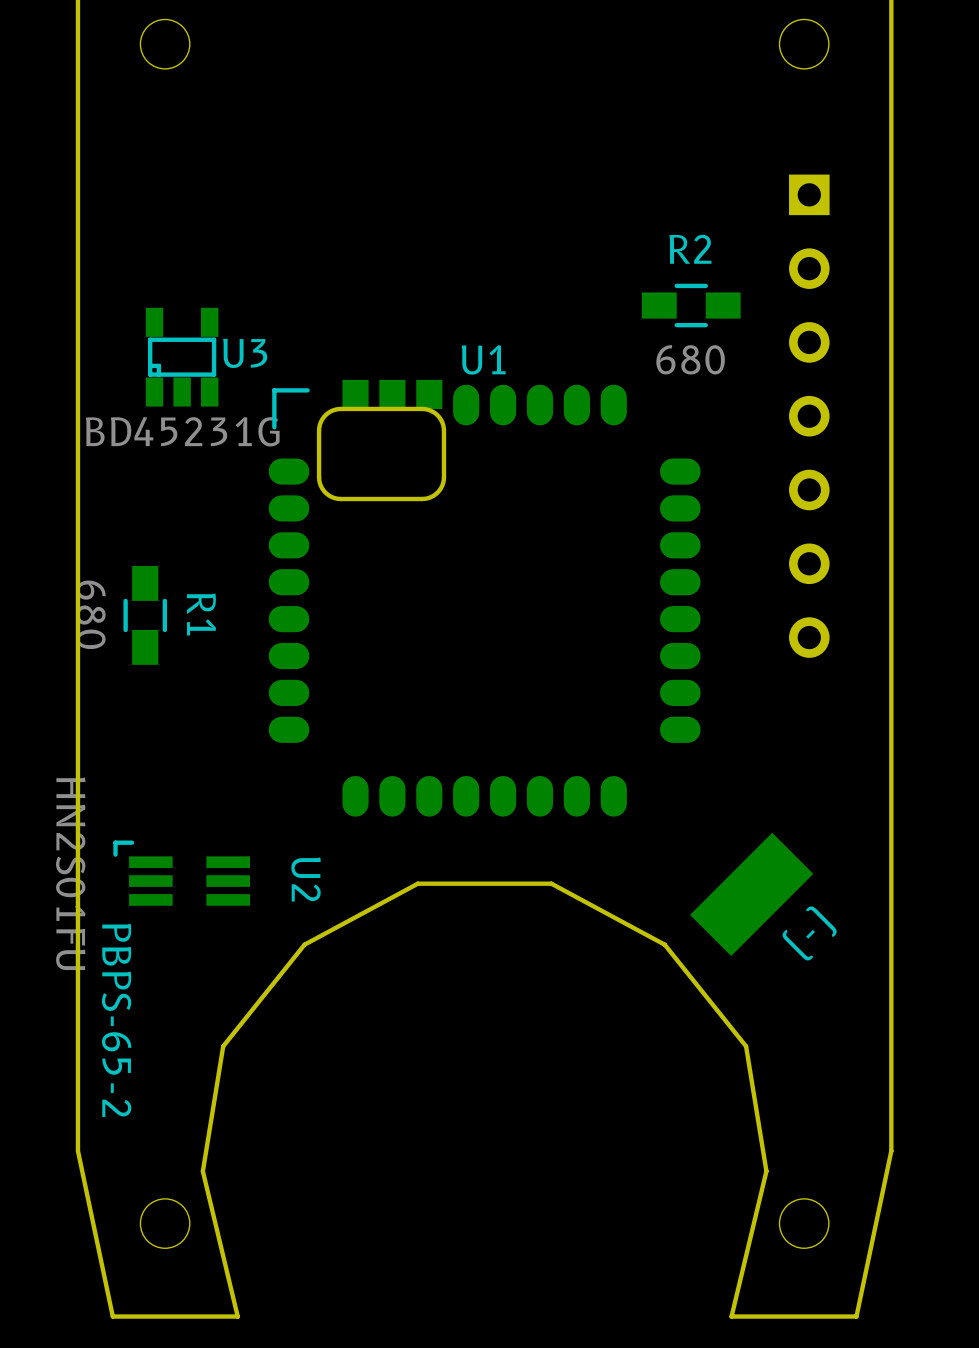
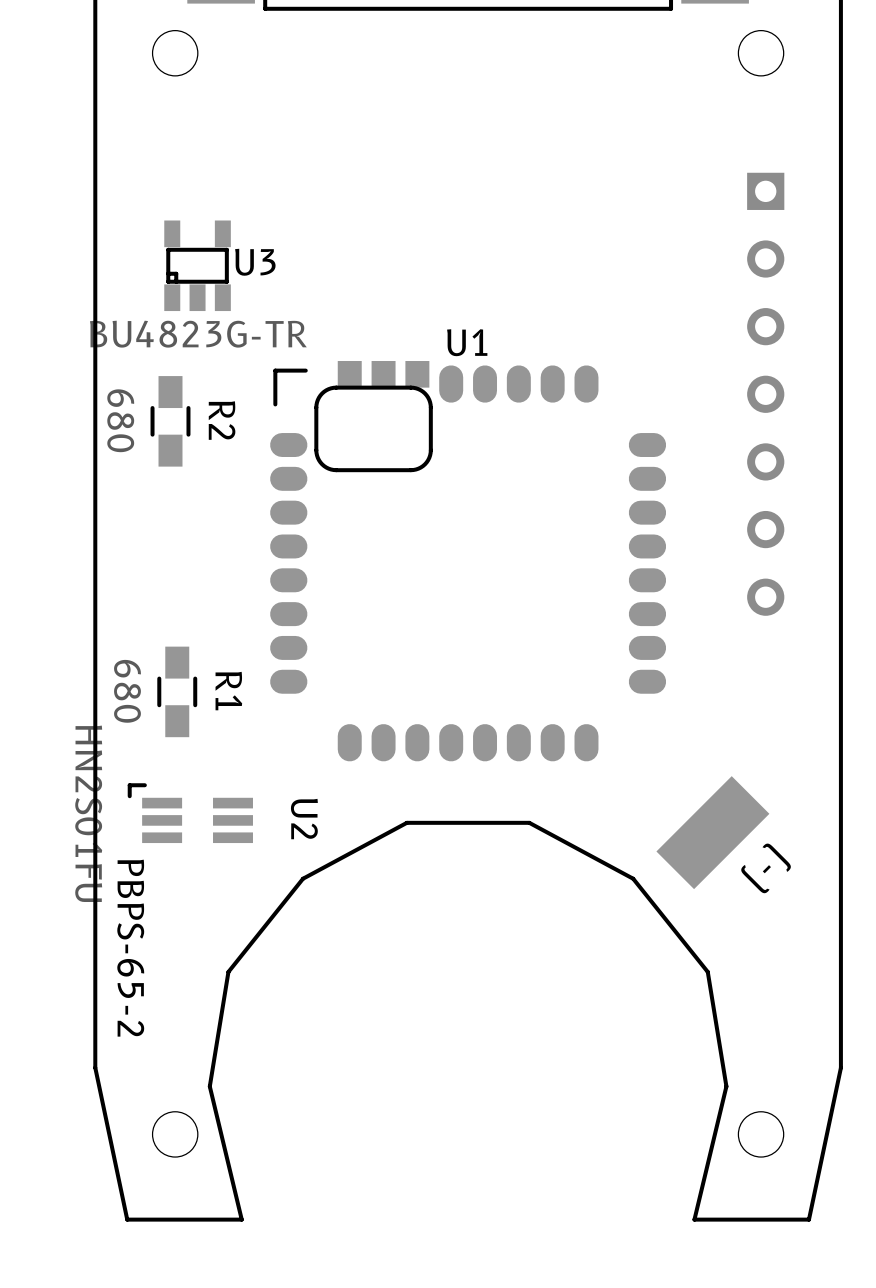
R2 rotation: 0° (691, 305) -> 90° clockwise (170, 421)
R2 position: (691, 305) -> (170, 421)
U3 position: (182, 357) -> (197, 265)
U3 value: BD45231G (182, 431) -> BU4823G-TR (198, 334)
R1 position: (145, 615) -> (177, 691)

